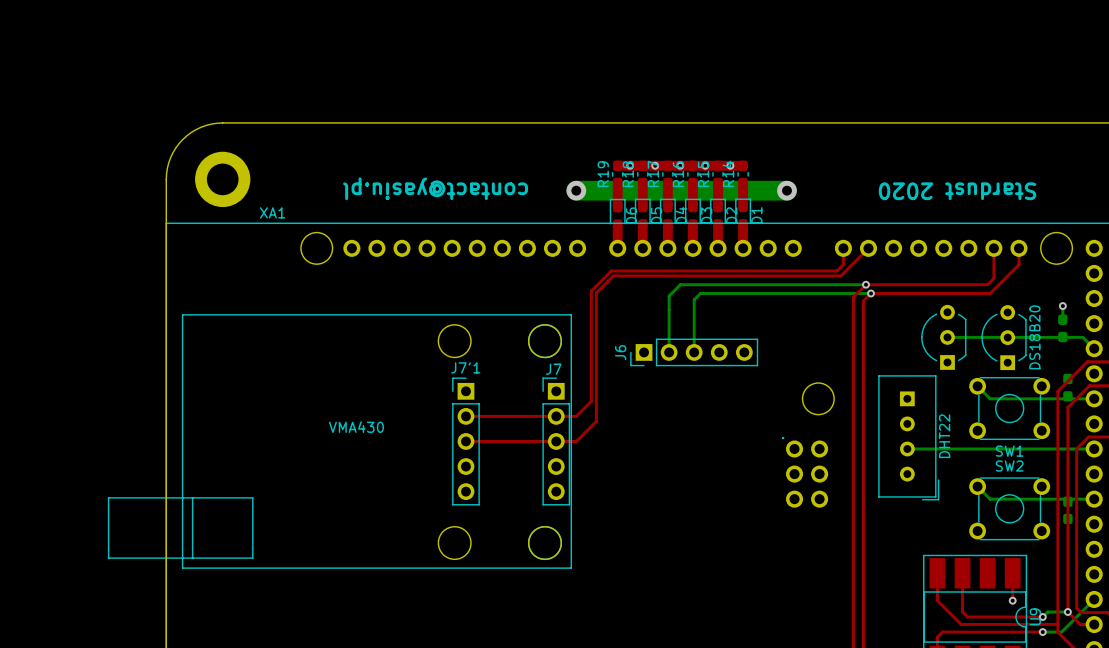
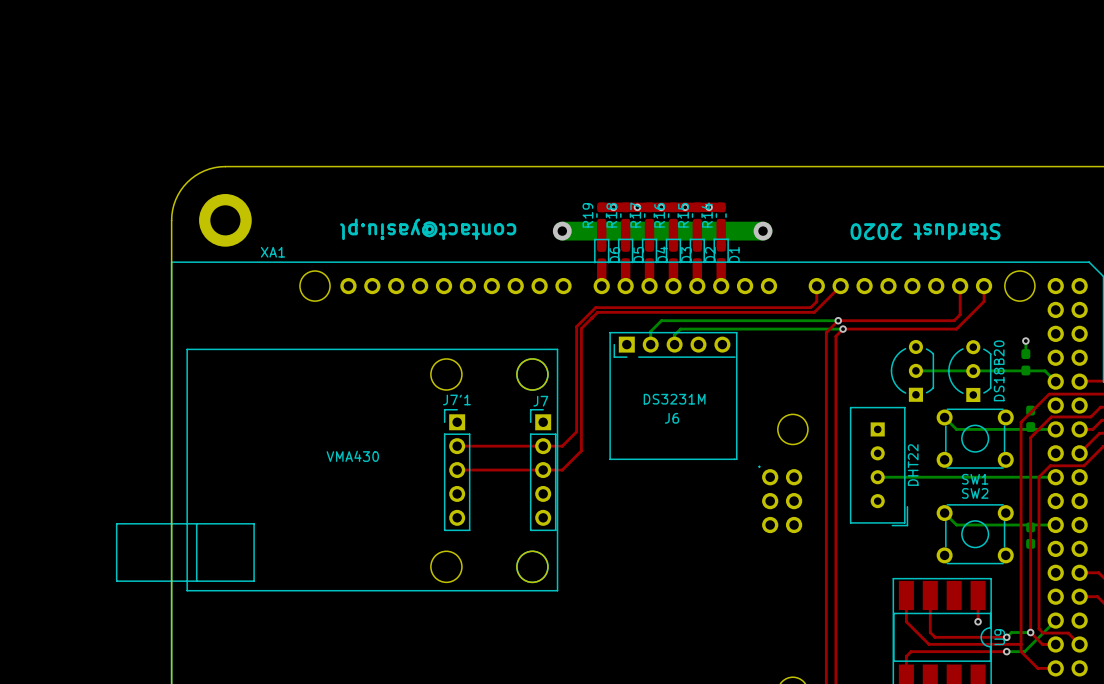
bottom track: (669, 309) (669, 352) -> none
bottom track: (694, 309) (694, 352) -> none
J6 footprint: [630, 338, 759, 367] -> [609, 332, 738, 460]
J6 name position: J6 (620, 352) -> J6 (672, 418)
J6 value: none -> DS3231M (674, 399)

